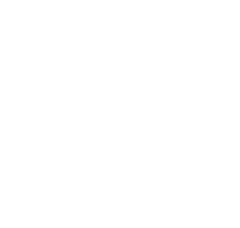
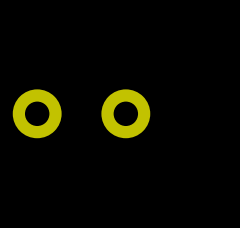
part: none -> (81, 113)

